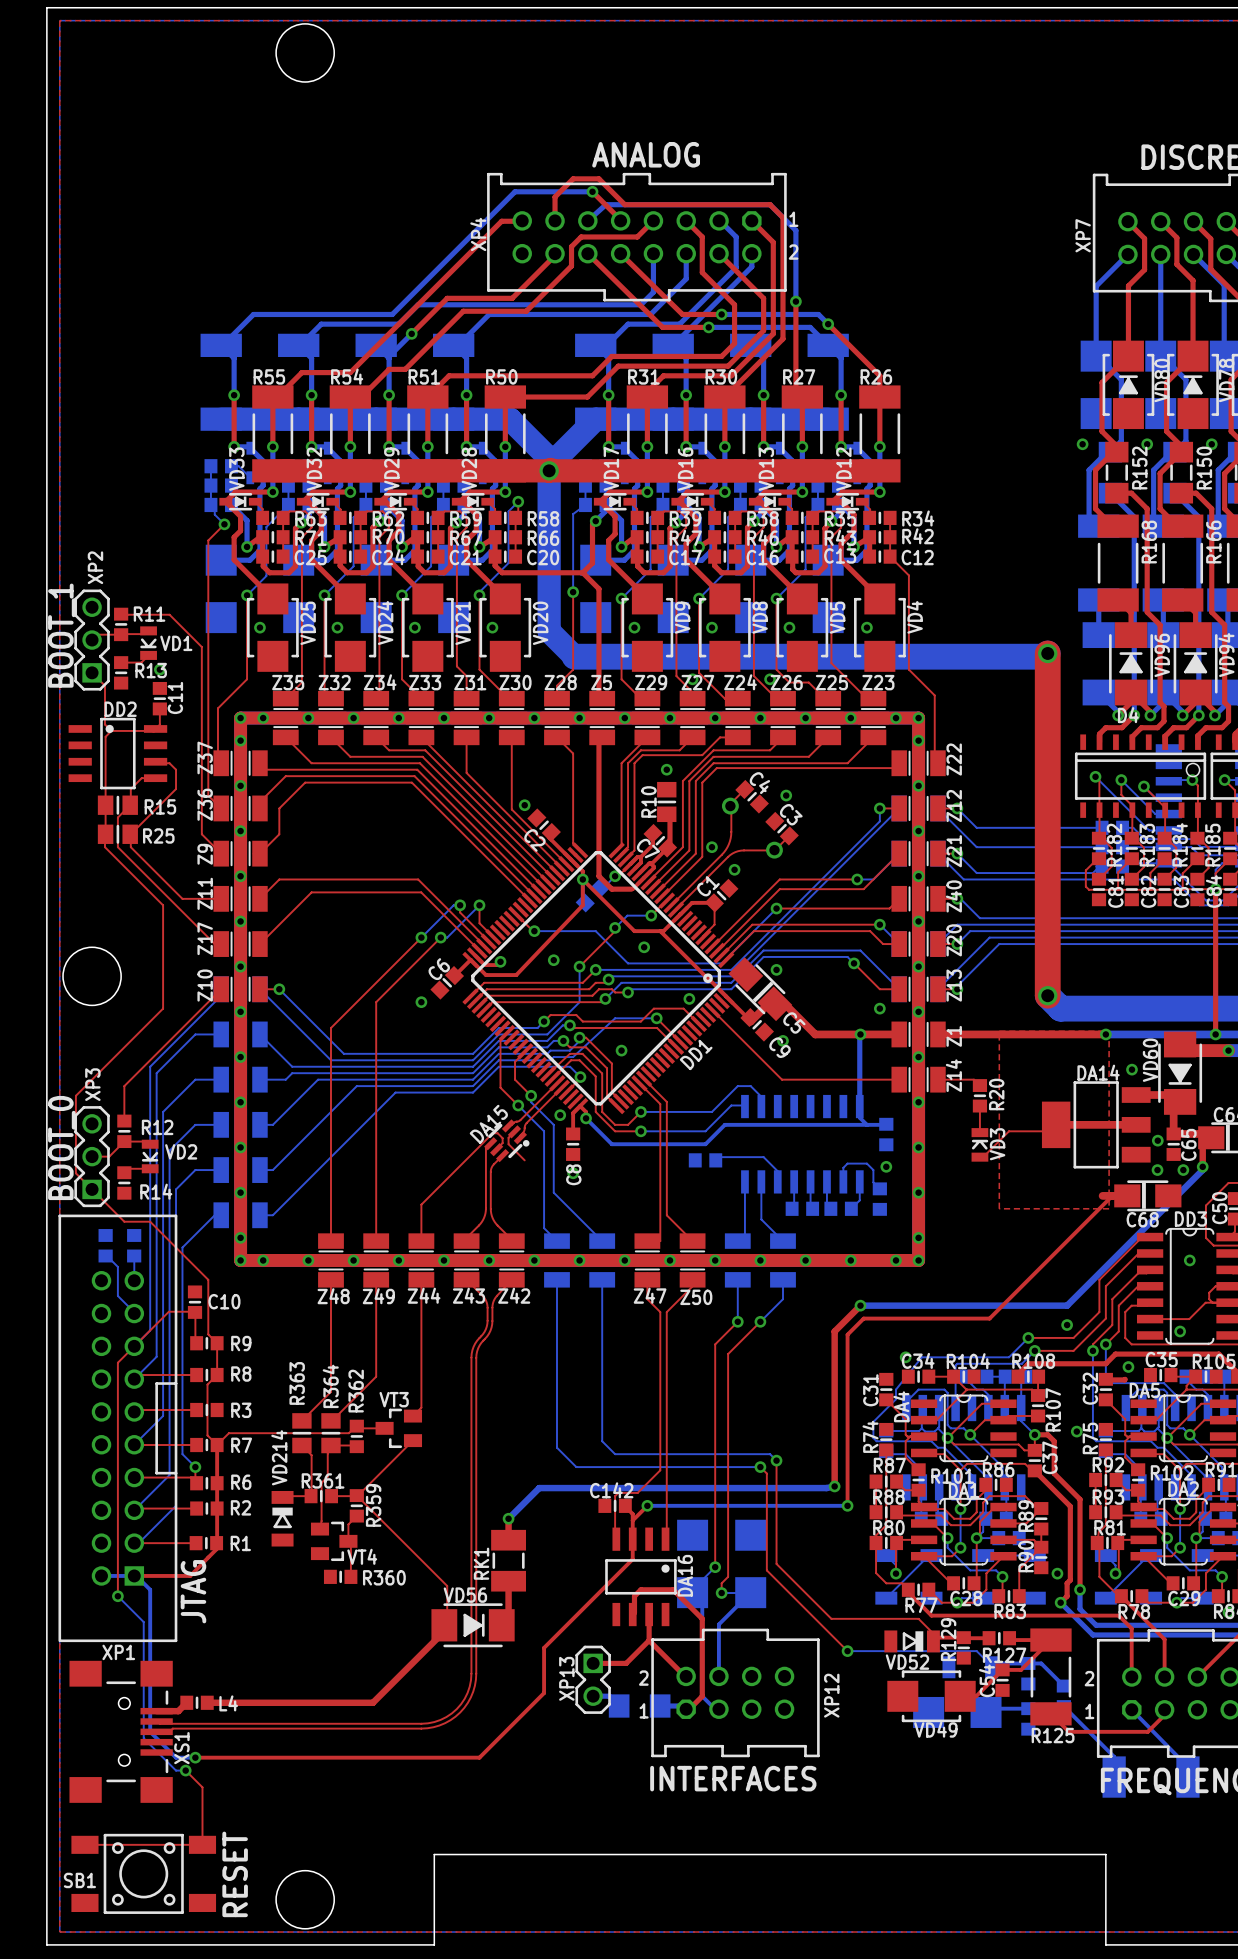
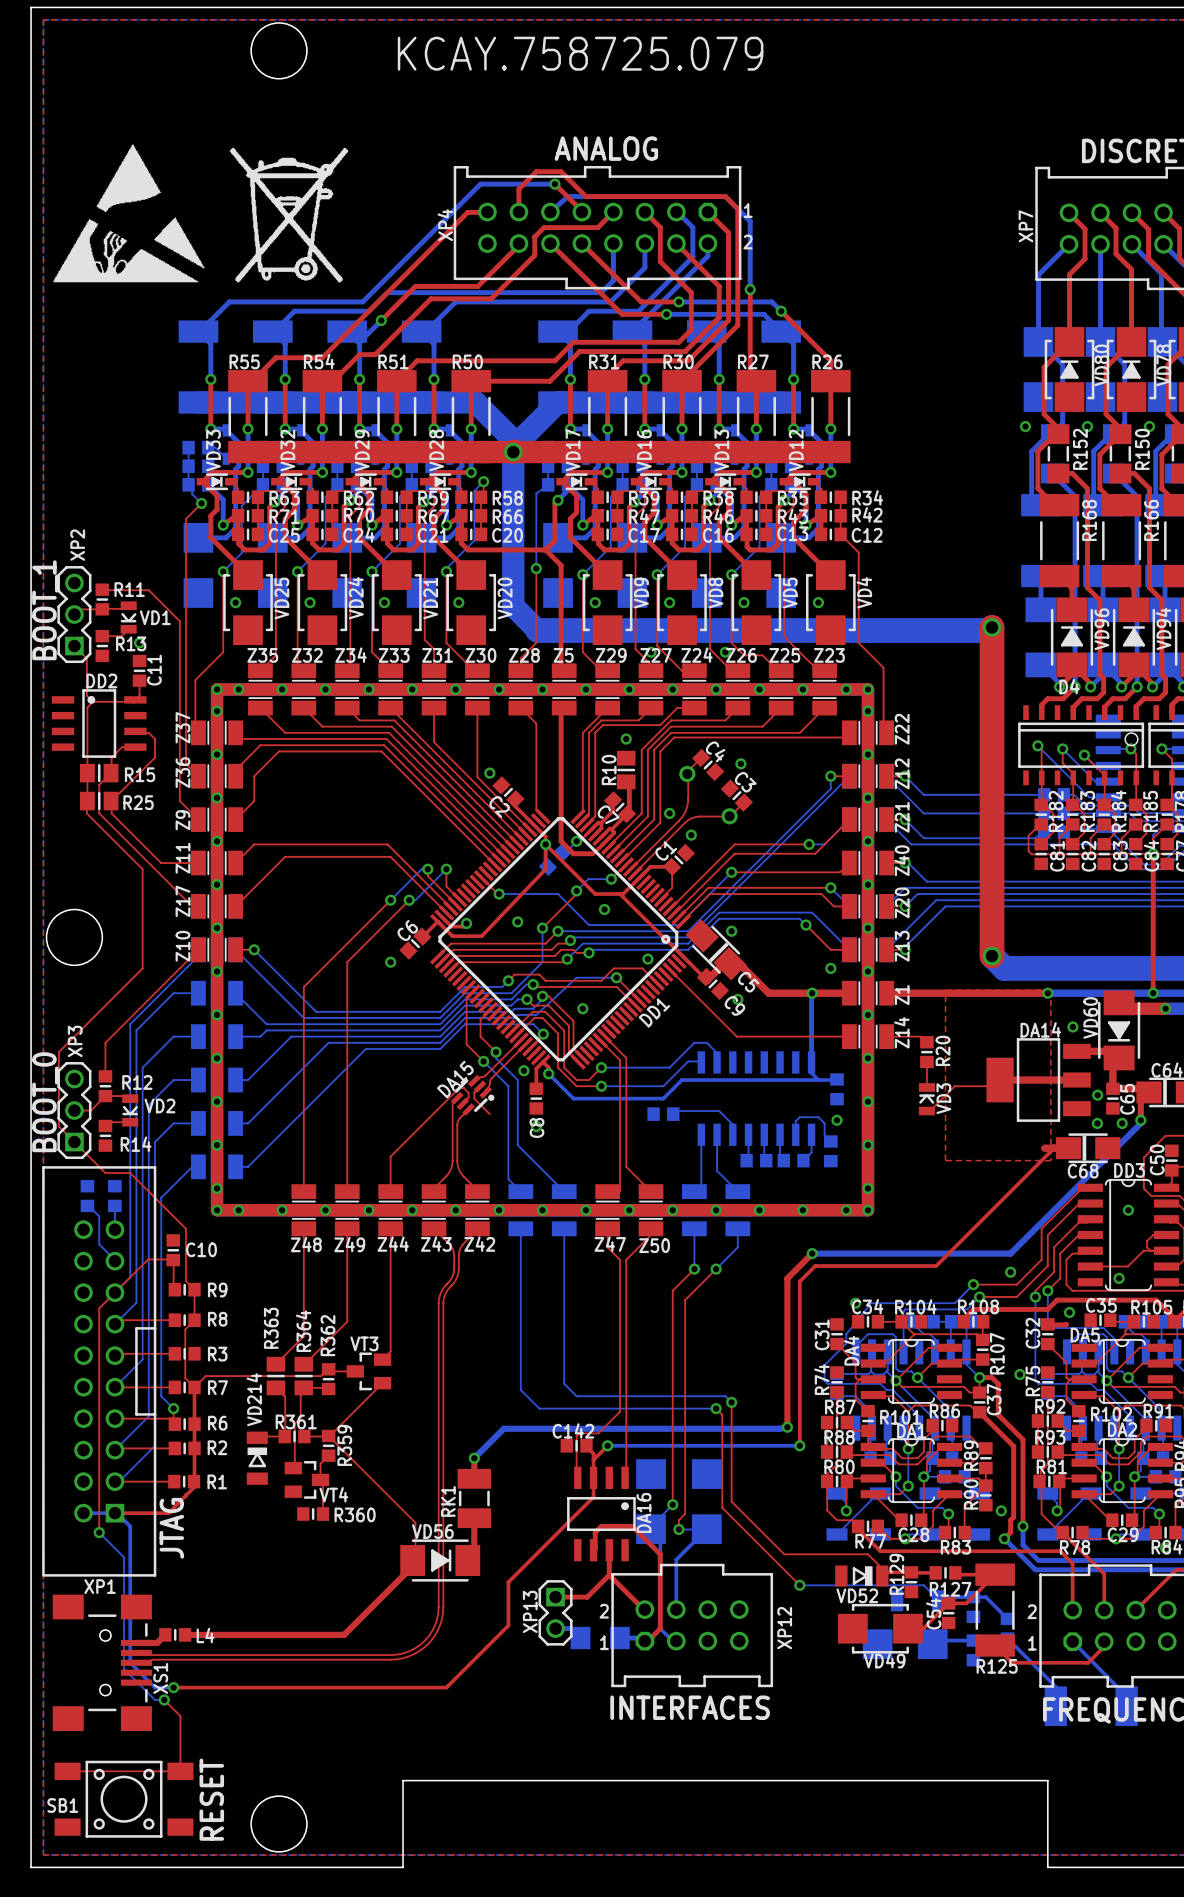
text: none -> KCAY.758725.079 (580, 53)
drawing: none -> [53, 144, 205, 283]
drawing: none -> [229, 147, 349, 283]

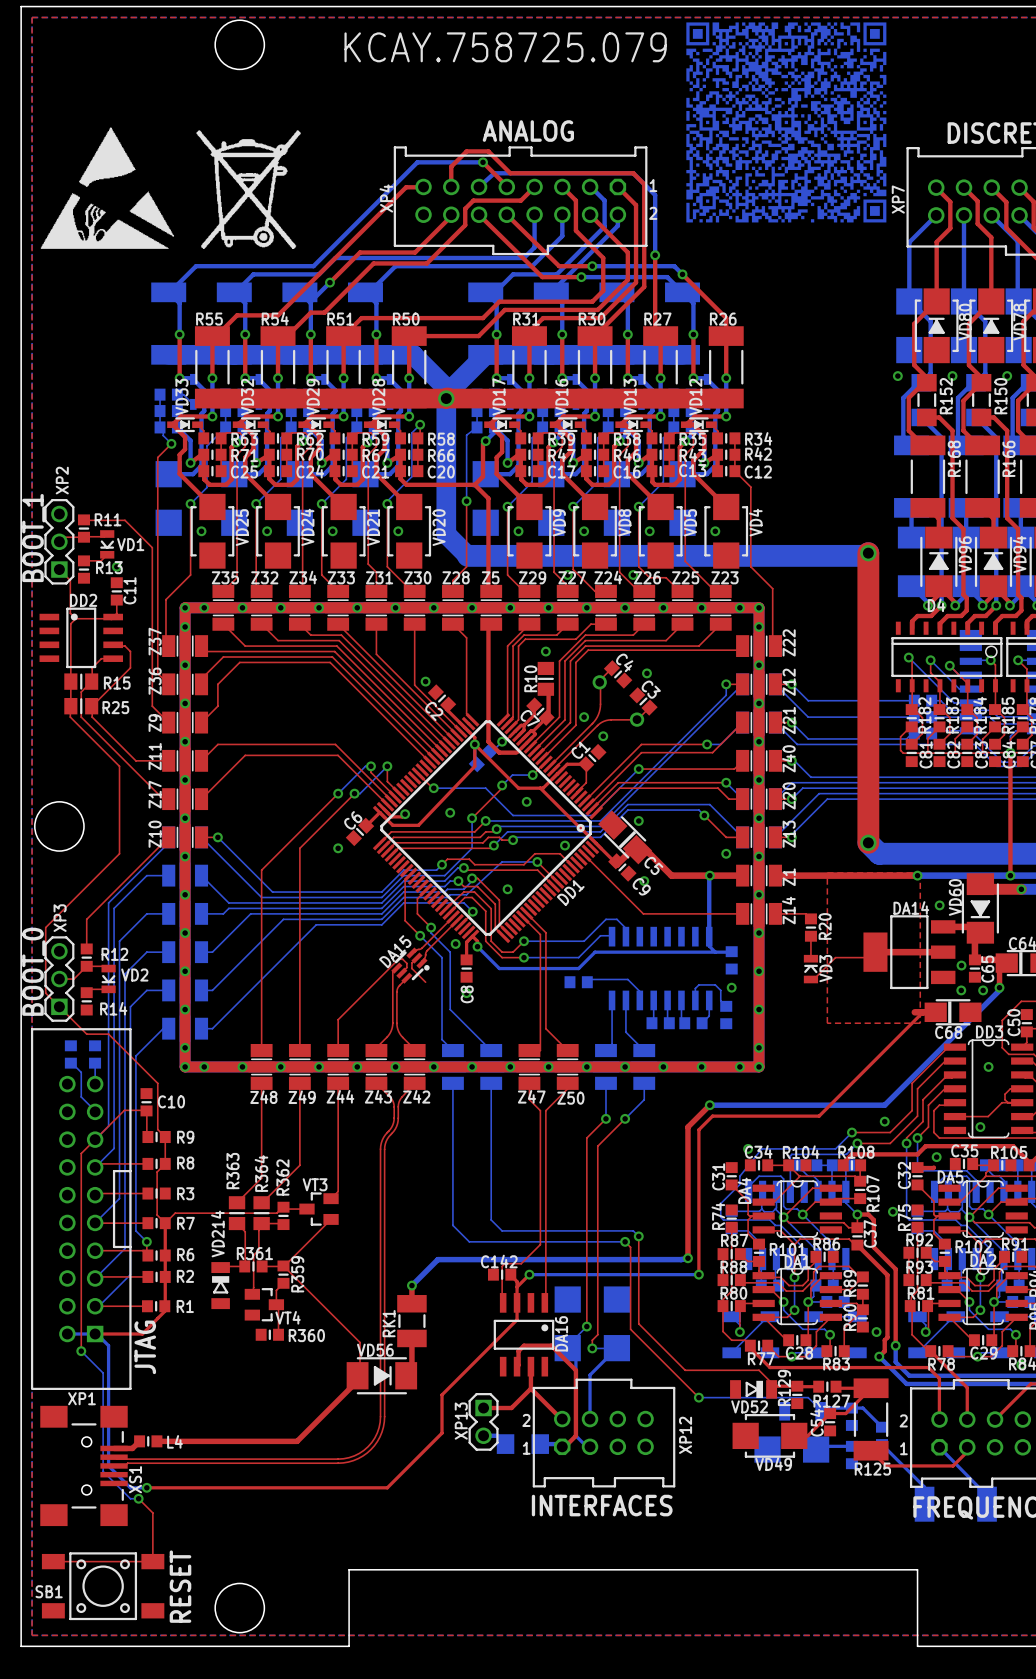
drawing: none -> [686, 22, 887, 223]

